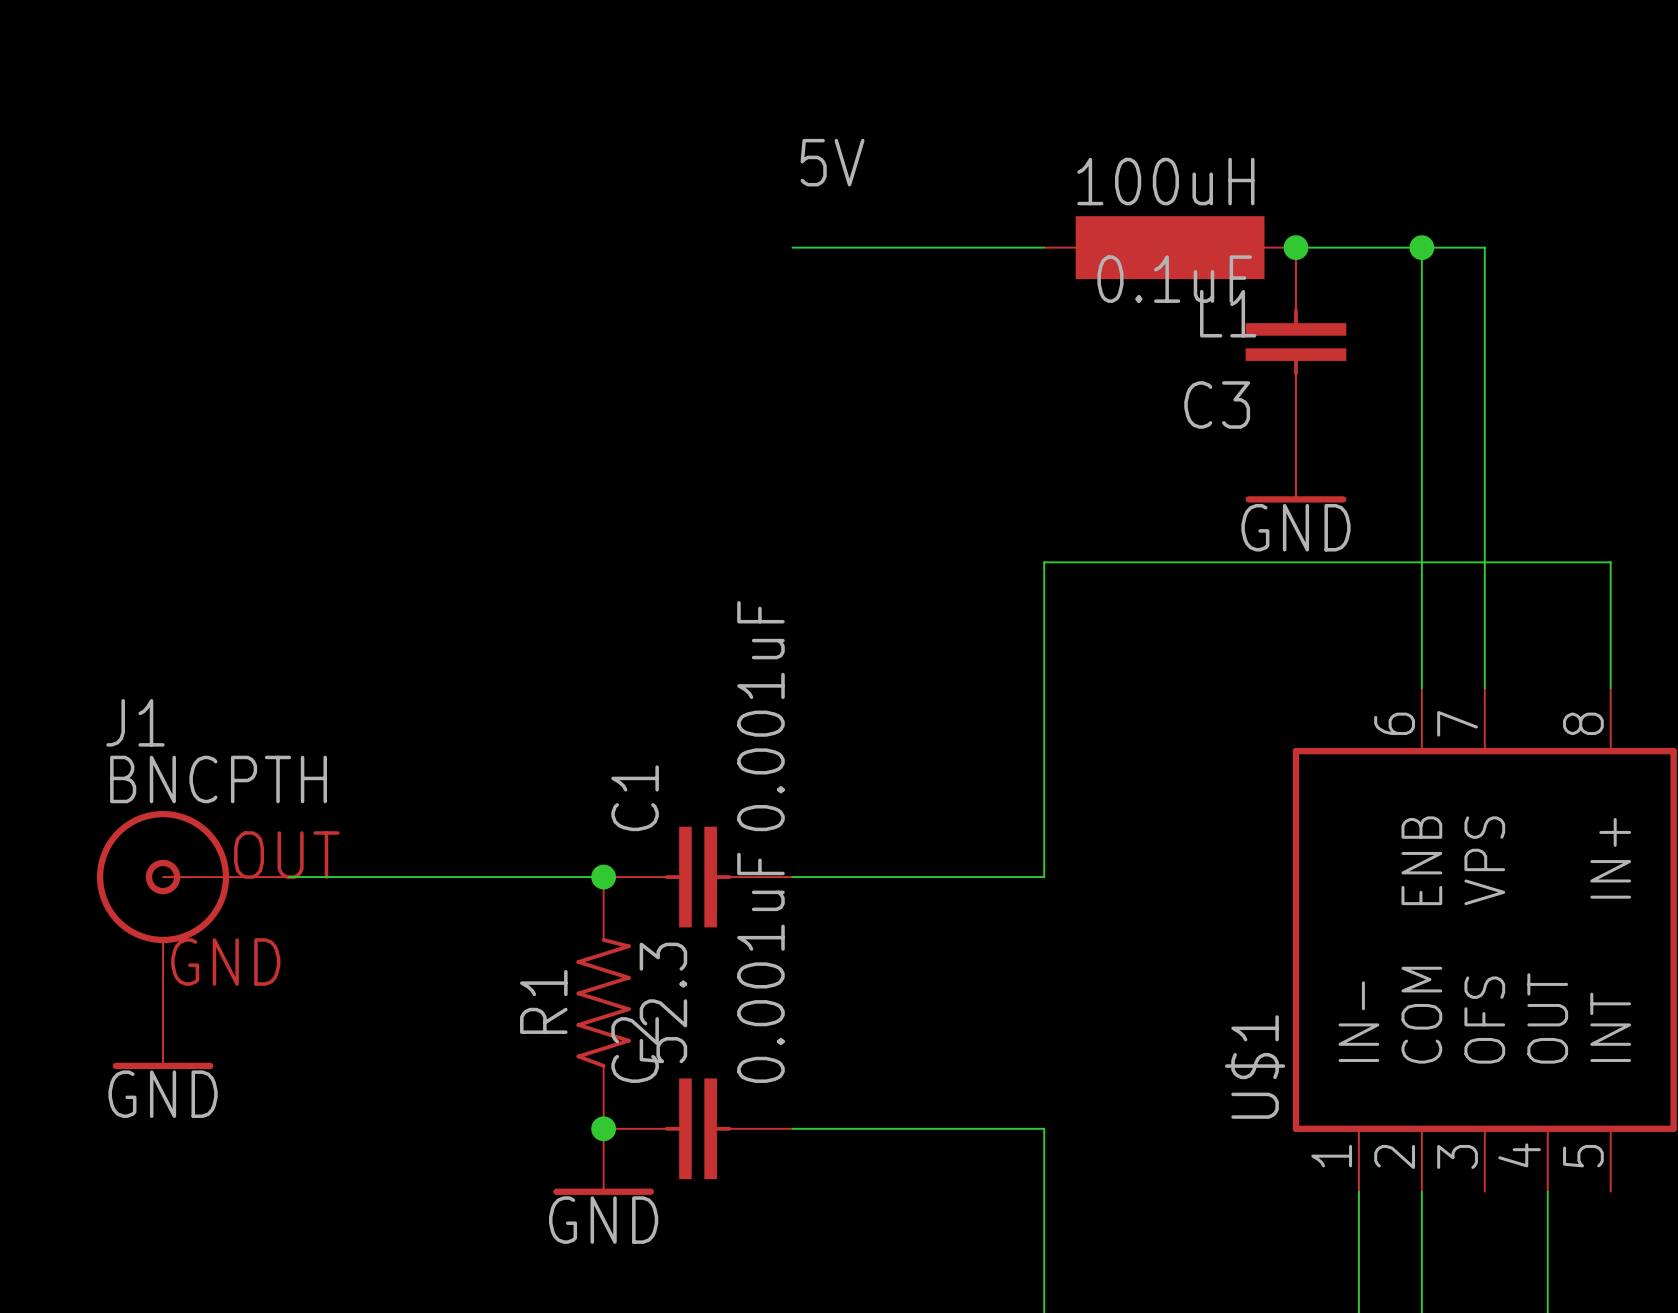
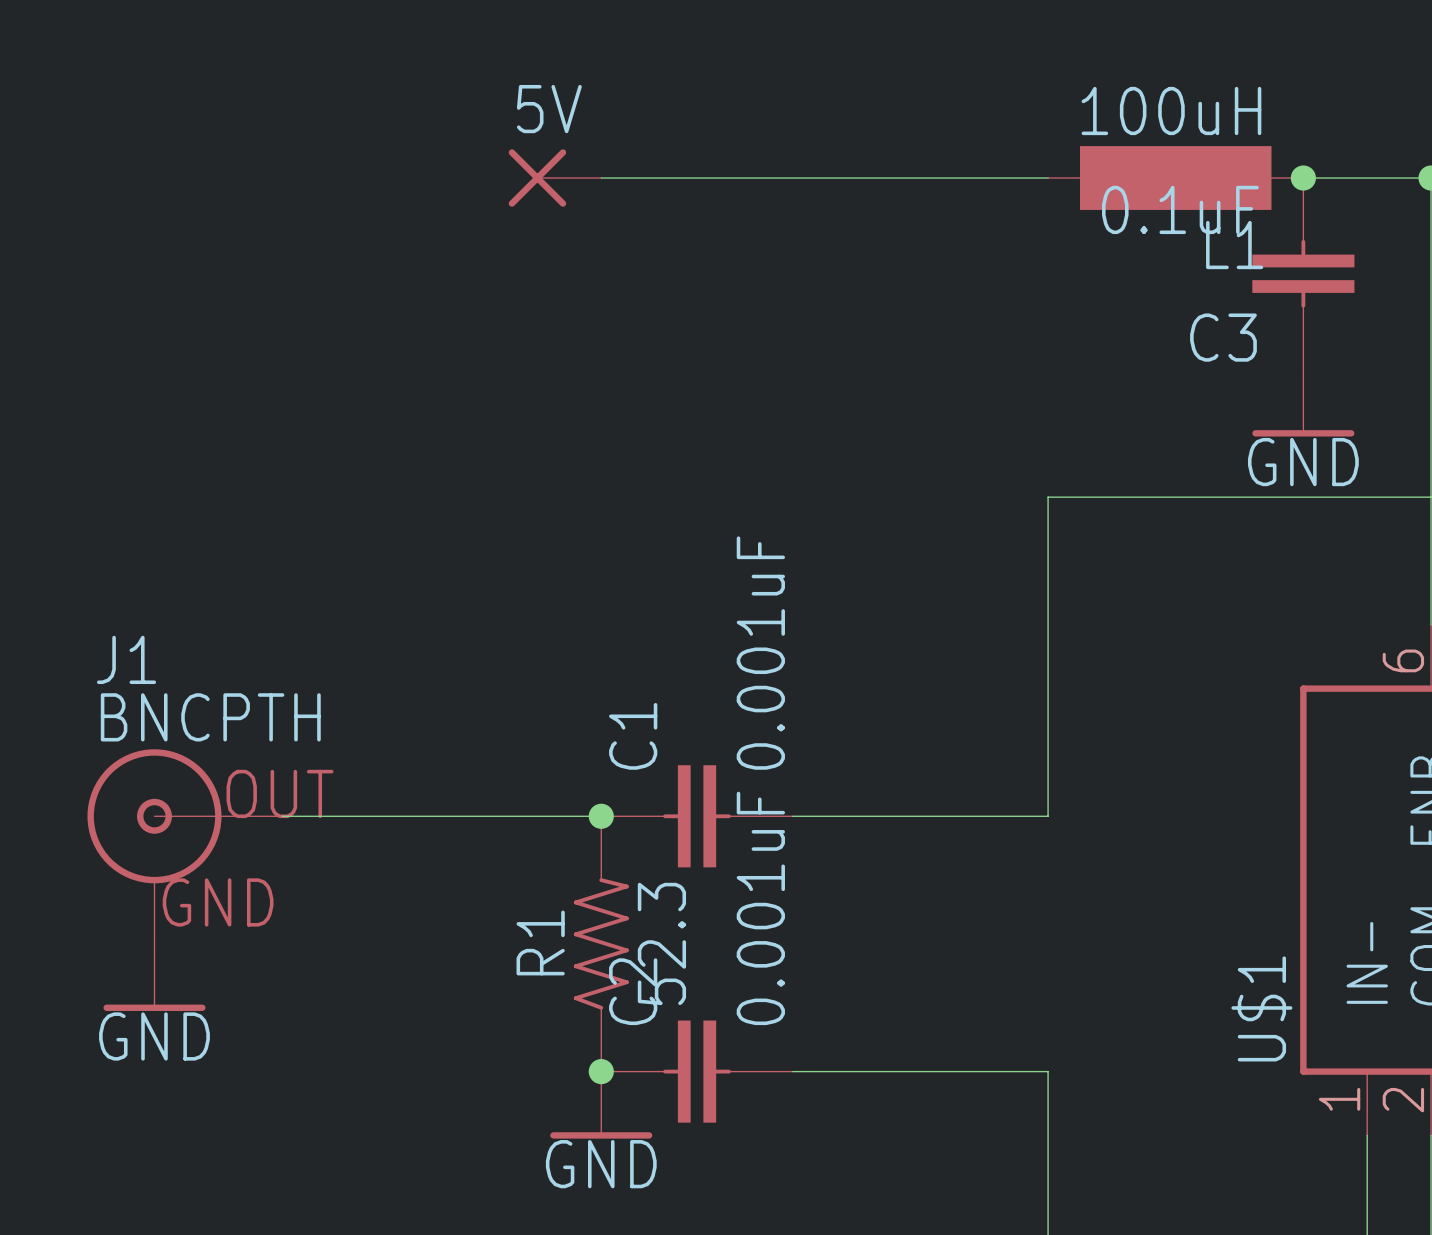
label: 5V (832, 162) -> none
5V: none -> (555, 178)
wire: none -> (601, 178) (792, 178)

